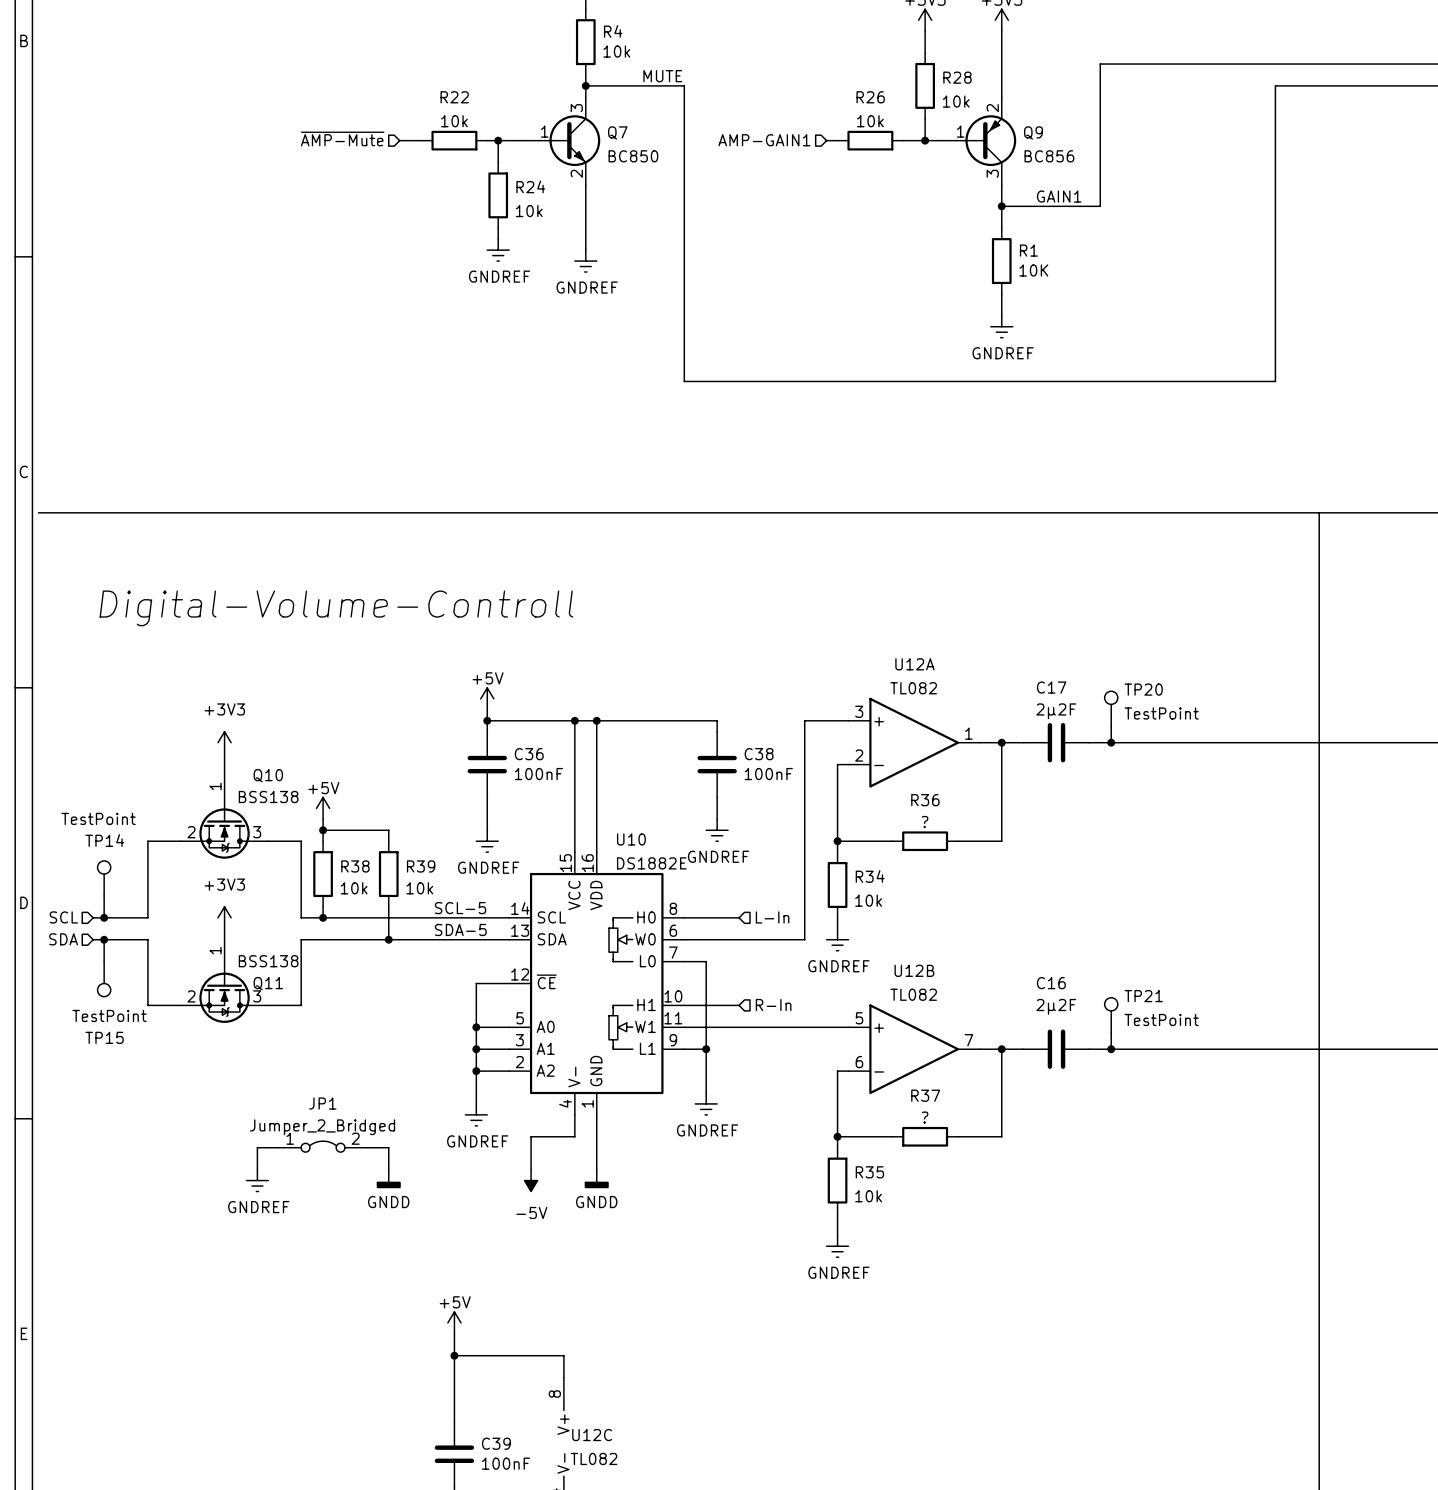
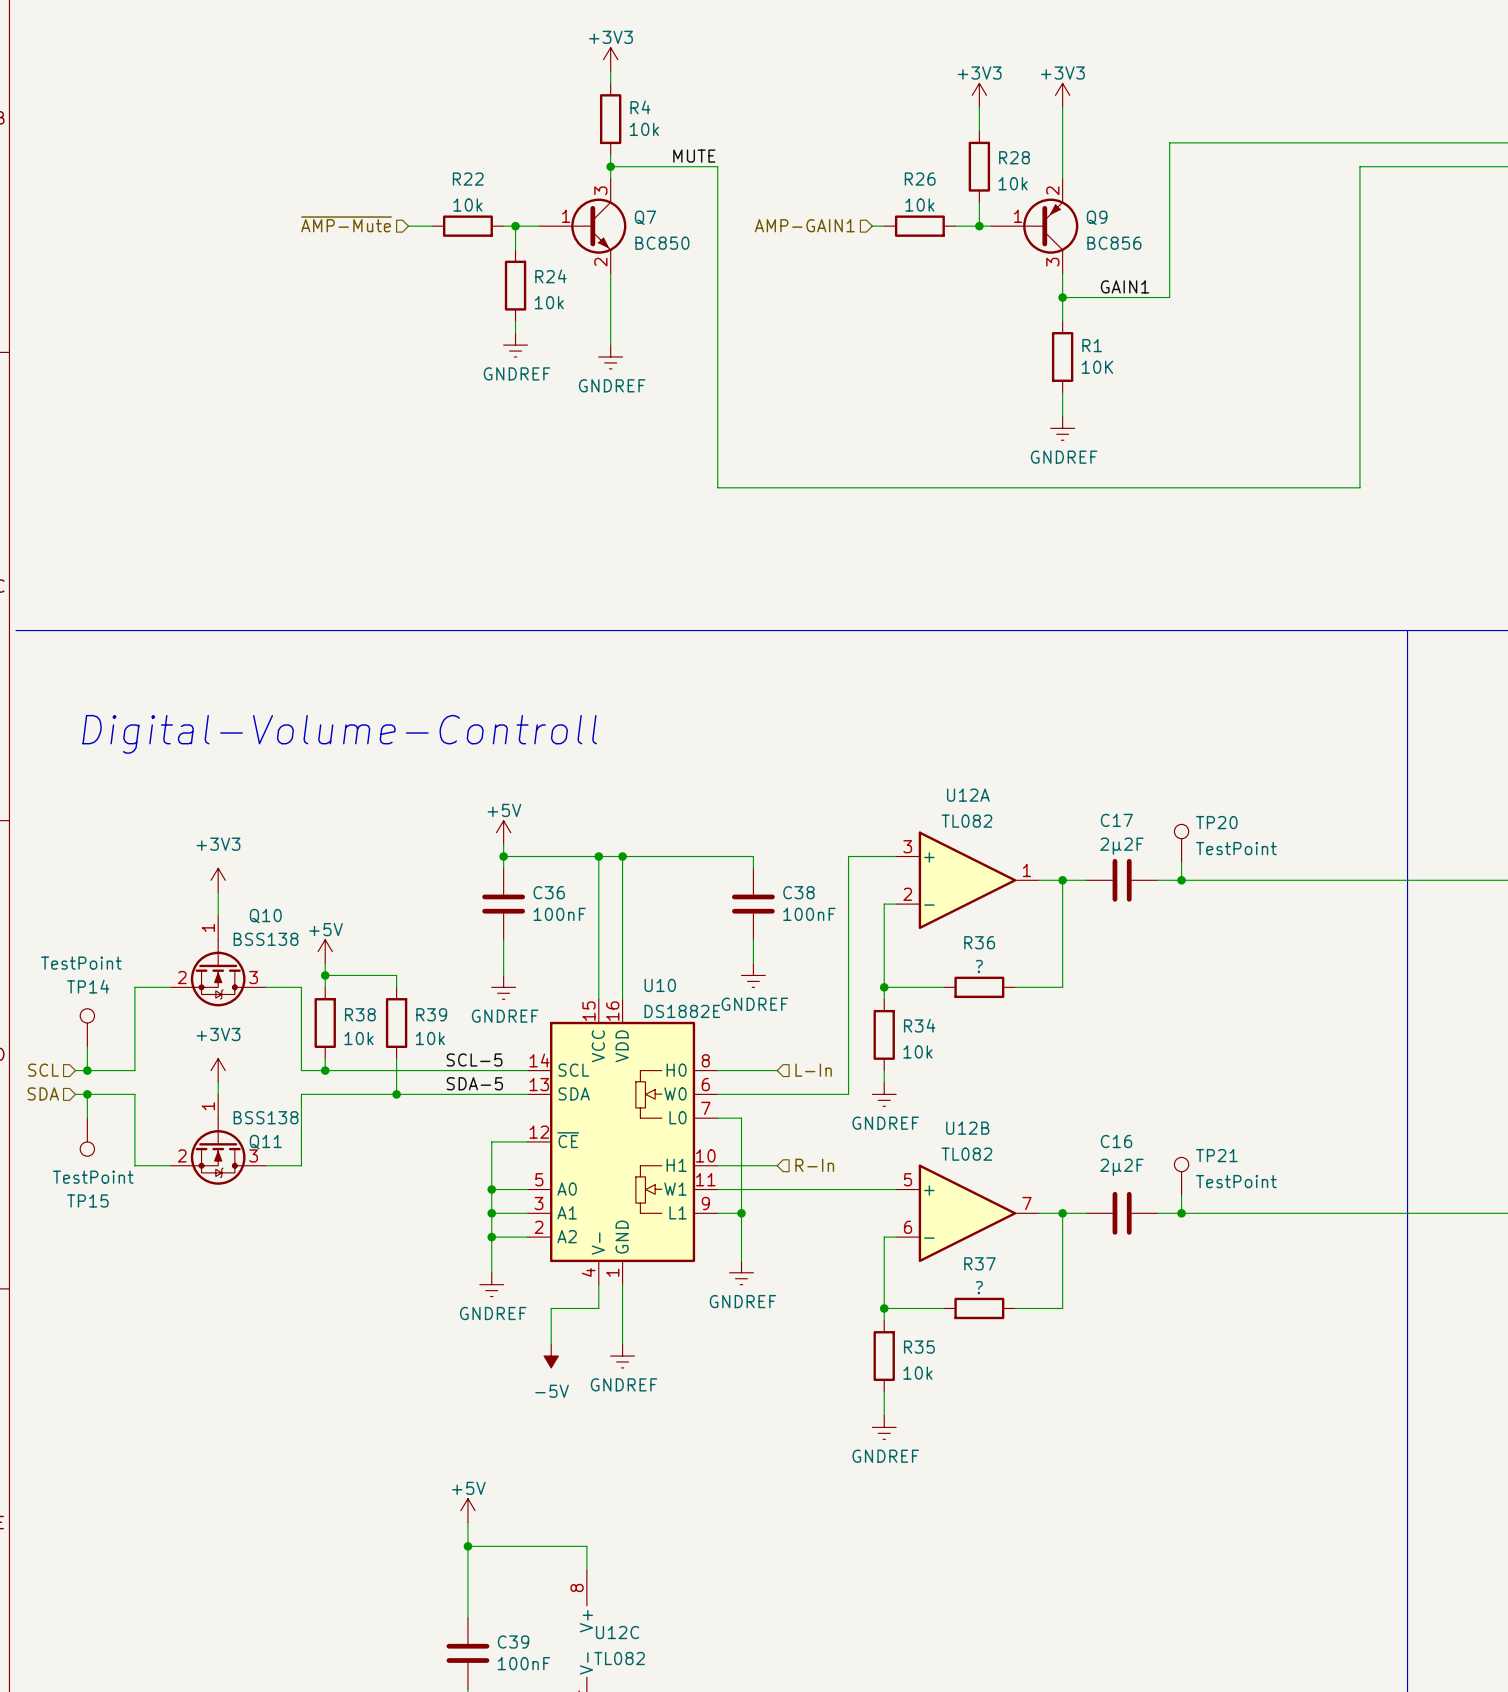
JP1: Jumper_2_Bridged (323, 1146) -> none
wire: (279, 1147) (257, 1147) (257, 1169) -> none
wire: (366, 1147) (388, 1147) (388, 1169) -> none
power symbol: GNDD (388, 1178) -> none
power symbol: GNDD (596, 1178) -> GNDREF (622, 1356)
power symbol: GNDREF (257, 1180) -> none

